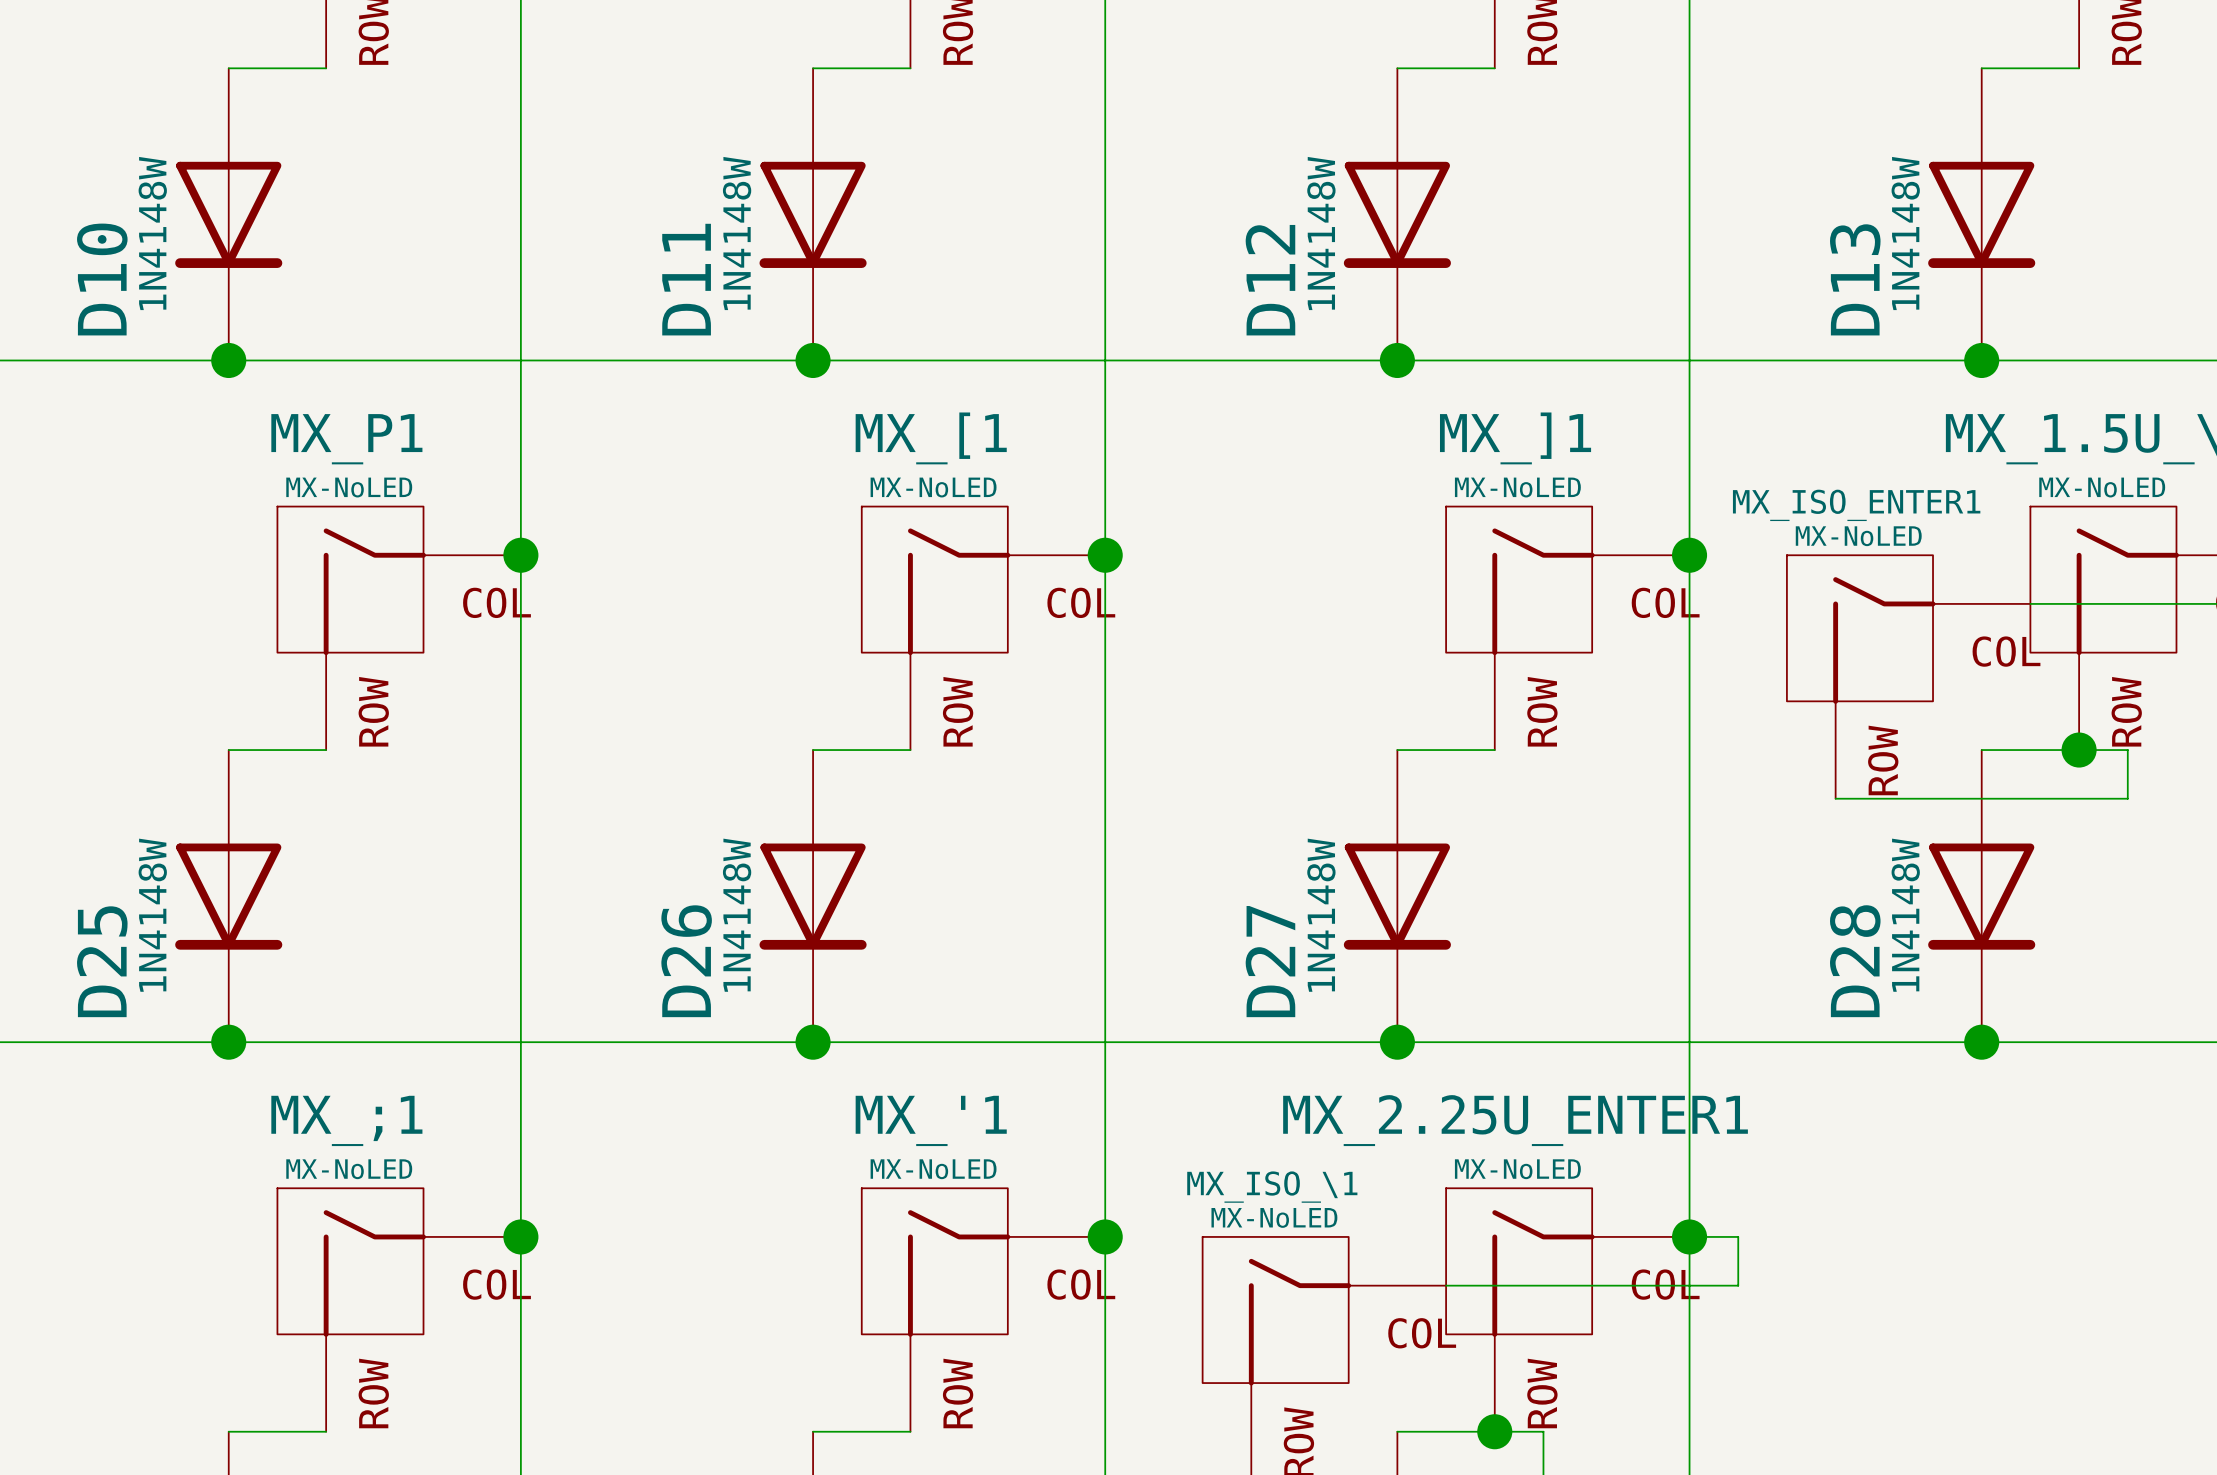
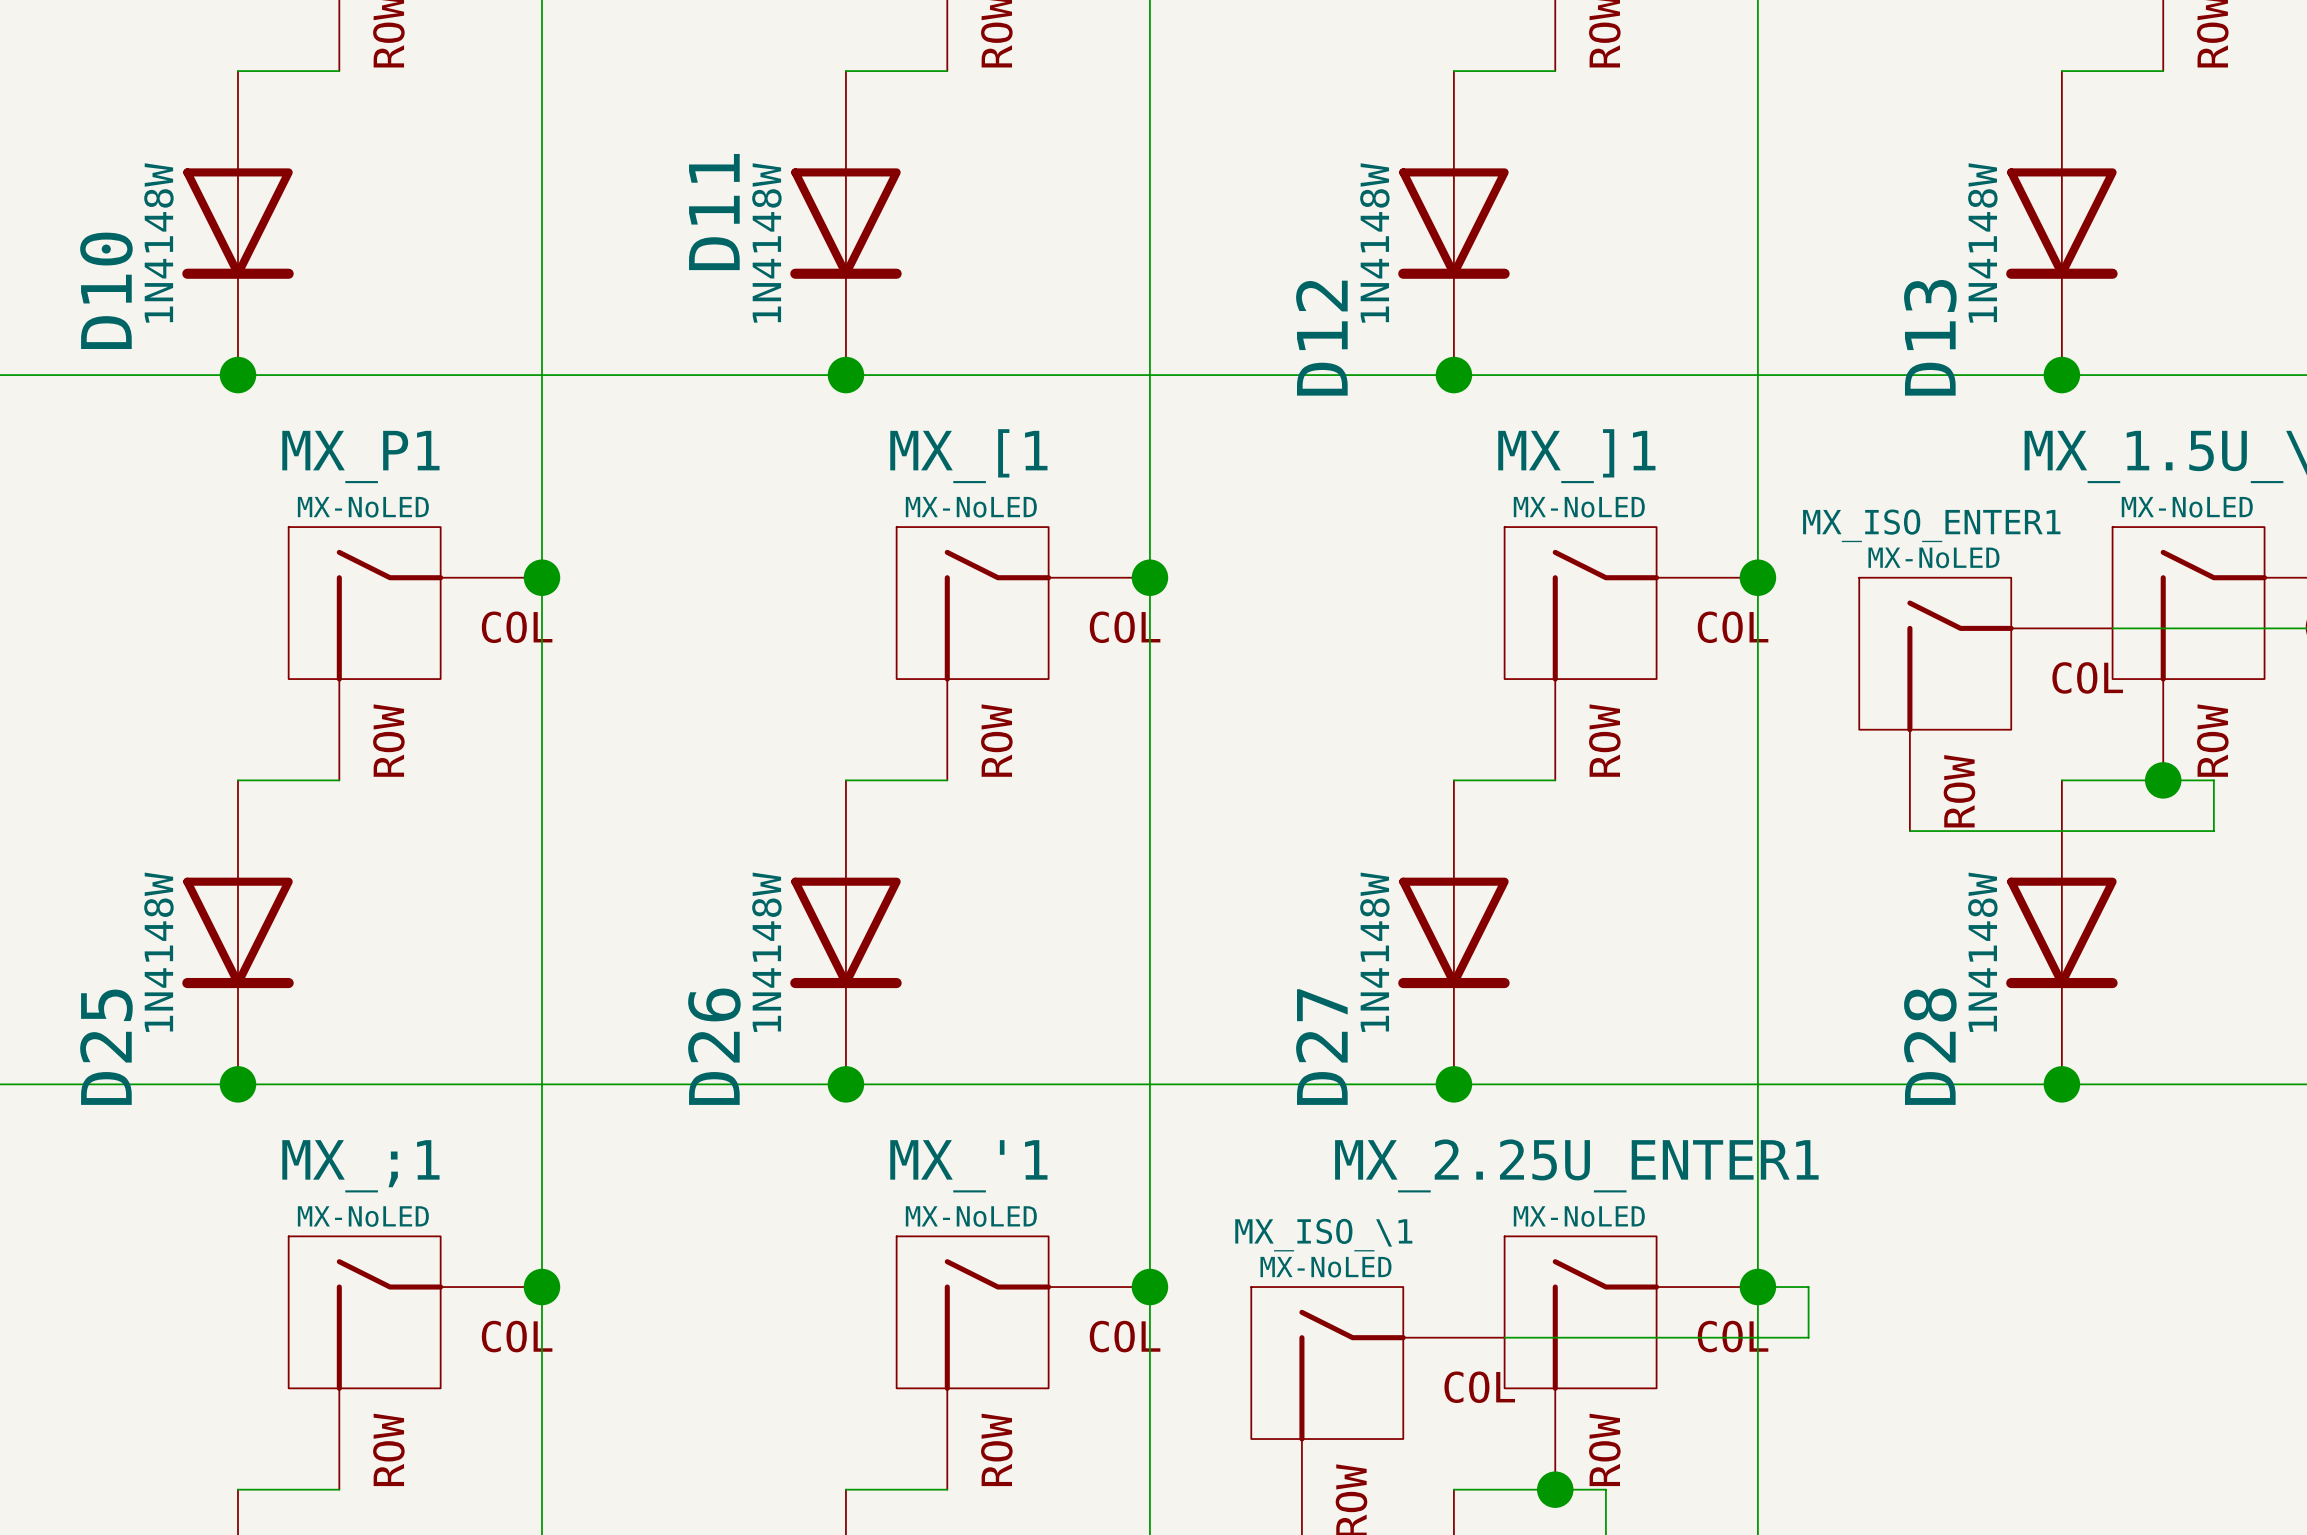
D11 name position: D11 (686, 279) -> D11 (714, 212)
D13 name position: D13 (1855, 279) -> D13 (1930, 337)
D12 name position: D12 (1270, 280) -> D12 (1321, 338)
D25 name position: D25 (102, 961) -> D25 (106, 1047)
D26 name position: D26 (686, 961) -> D26 (714, 1046)
D27 name position: D27 (1270, 961) -> D27 (1321, 1047)
D28 name position: D28 (1855, 961) -> D28 (1930, 1046)

